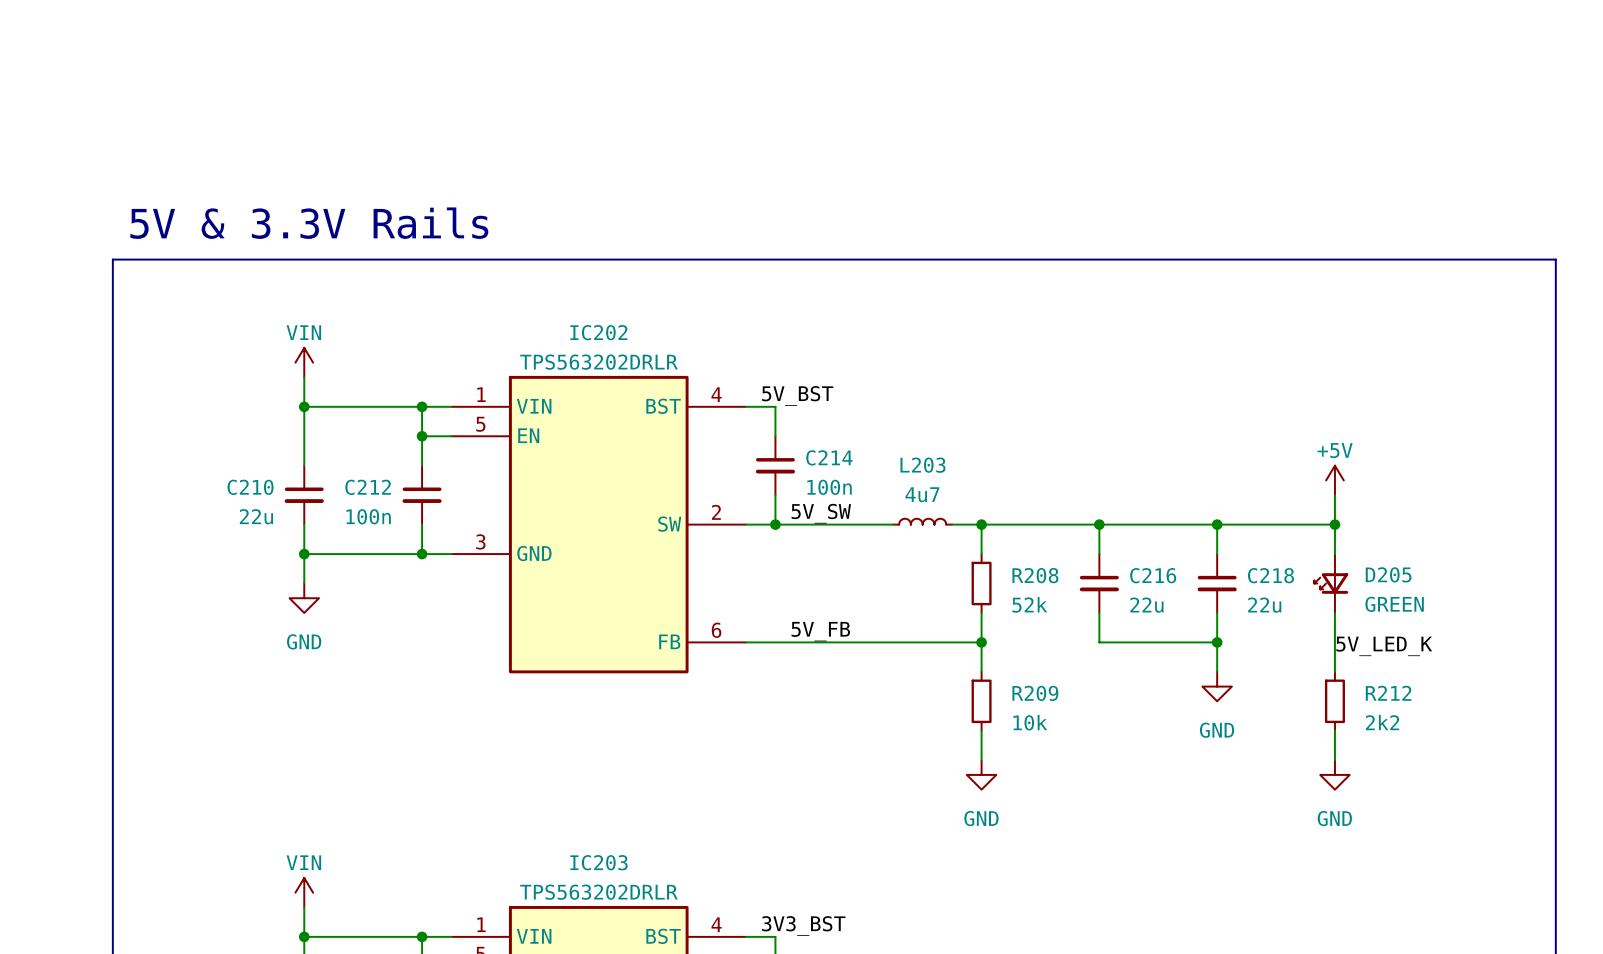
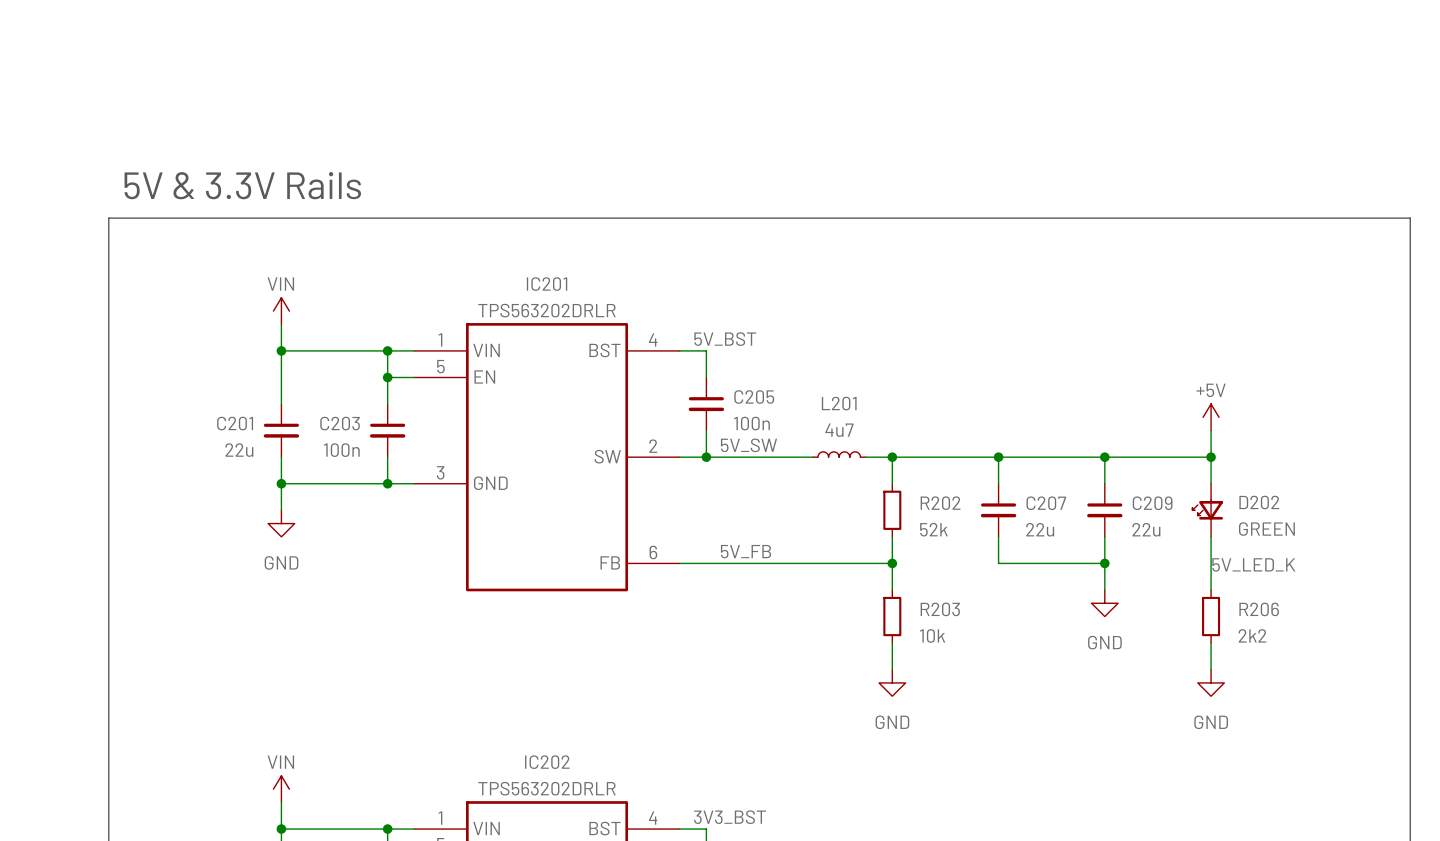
IC202 name: IC202 (598, 332) -> IC201 (547, 284)
C214 name: C214 (829, 457) -> C205 (754, 396)
L203 name: L203 (922, 465) -> L201 (839, 403)
C210 name: C210 (250, 487) -> C201 (235, 423)
C212 name: C212 (368, 487) -> C203 (340, 423)
D205 name: D205 (1388, 574) -> D202 (1259, 502)
R208 name: R208 (1035, 575) -> R202 (940, 503)
C216 name: C216 (1153, 575) -> C207 (1046, 503)
C218 name: C218 (1270, 575) -> C209 (1152, 503)
R209 name: R209 (1035, 693) -> R203 (940, 609)
R212 name: R212 (1388, 693) -> R206 (1259, 609)
IC203 name: IC203 (598, 862) -> IC202 (547, 762)

